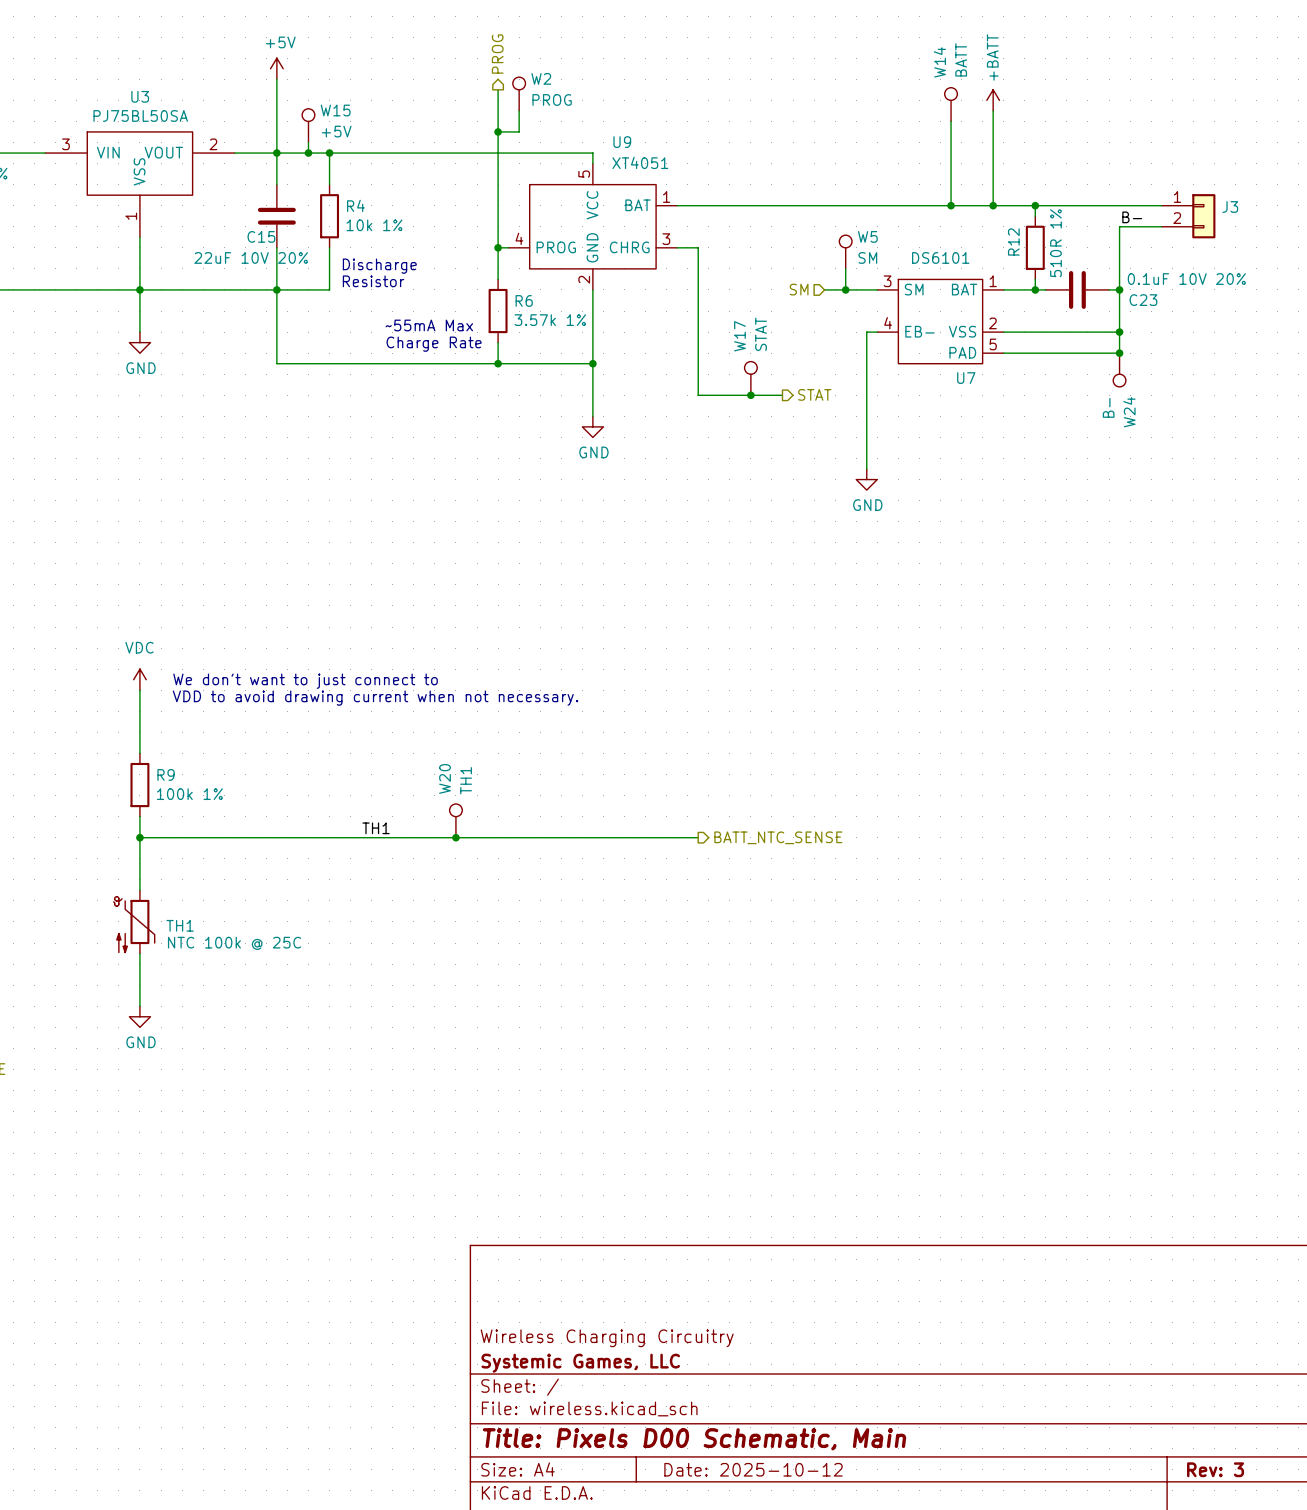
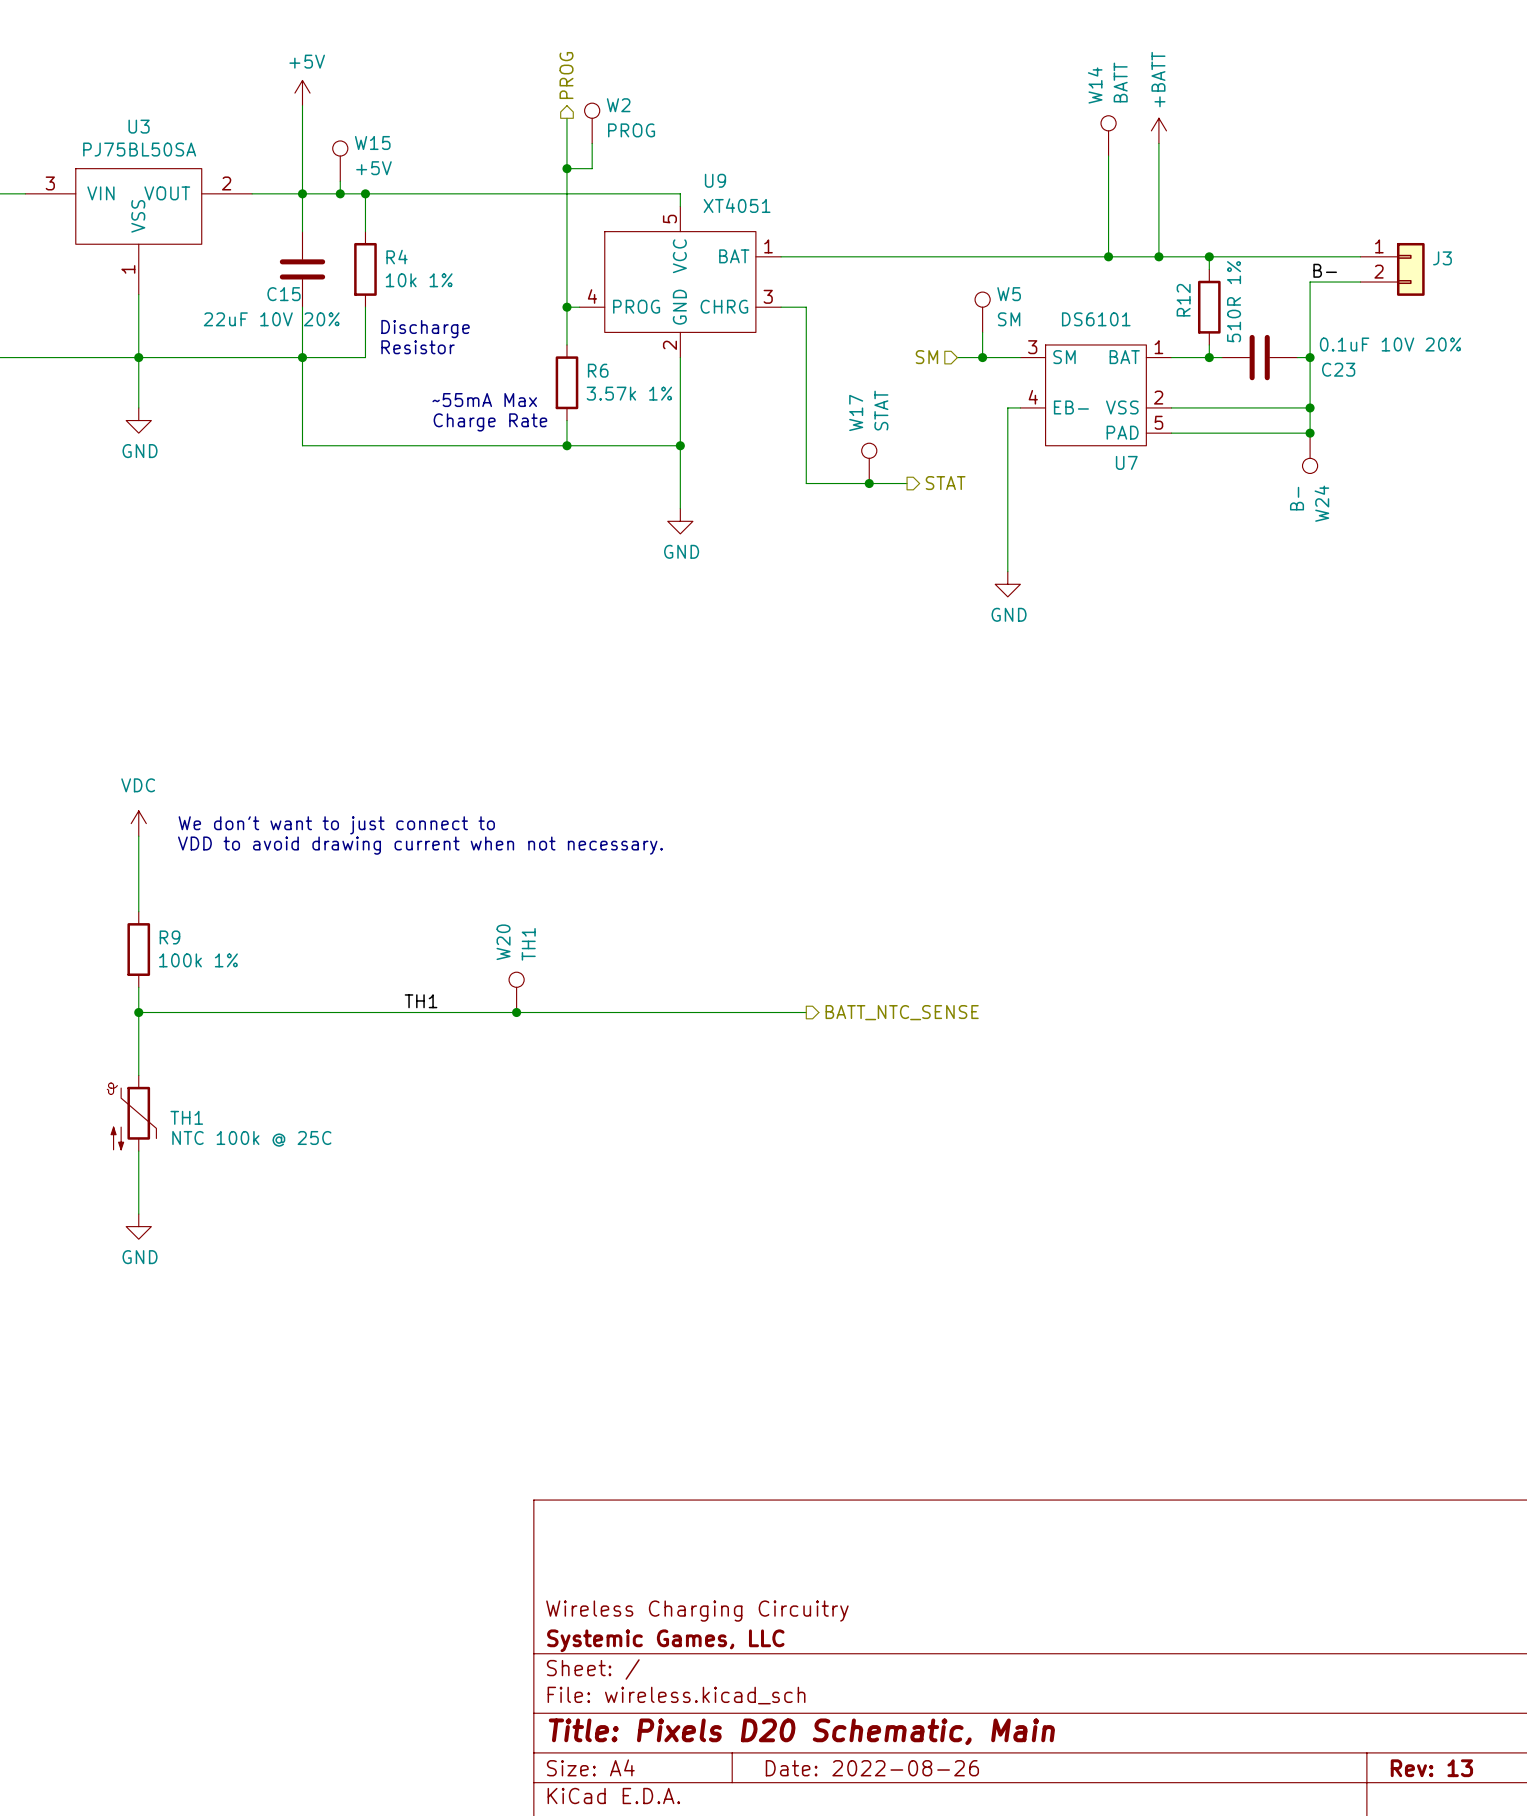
title block: Title: Pixels D00 Schematic, Main (694, 1439) -> Title: Pixels D20 Schematic, Main (801, 1731)
title block: Date: 2025-10-12 (753, 1469) -> Date: 2022-08-26 (872, 1768)
title block: Rev: 3 (1215, 1469) -> Rev: 13 (1431, 1768)

